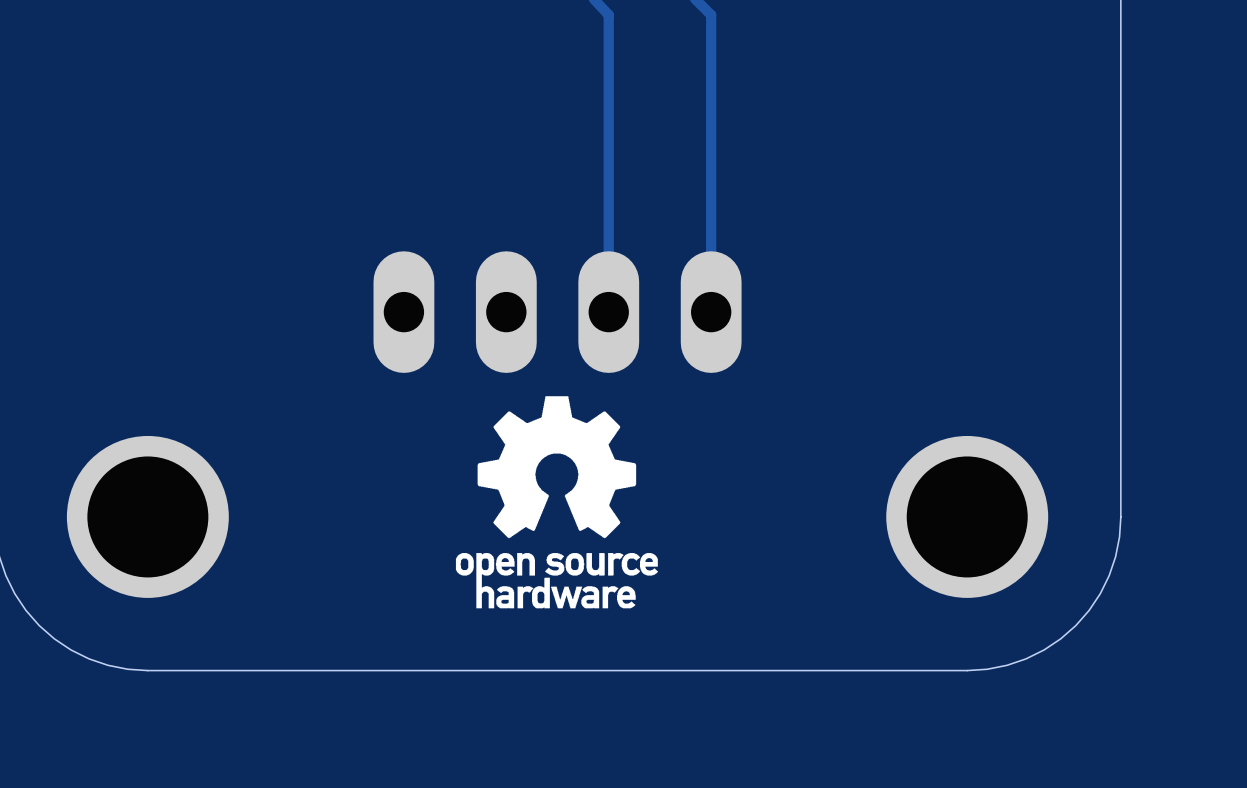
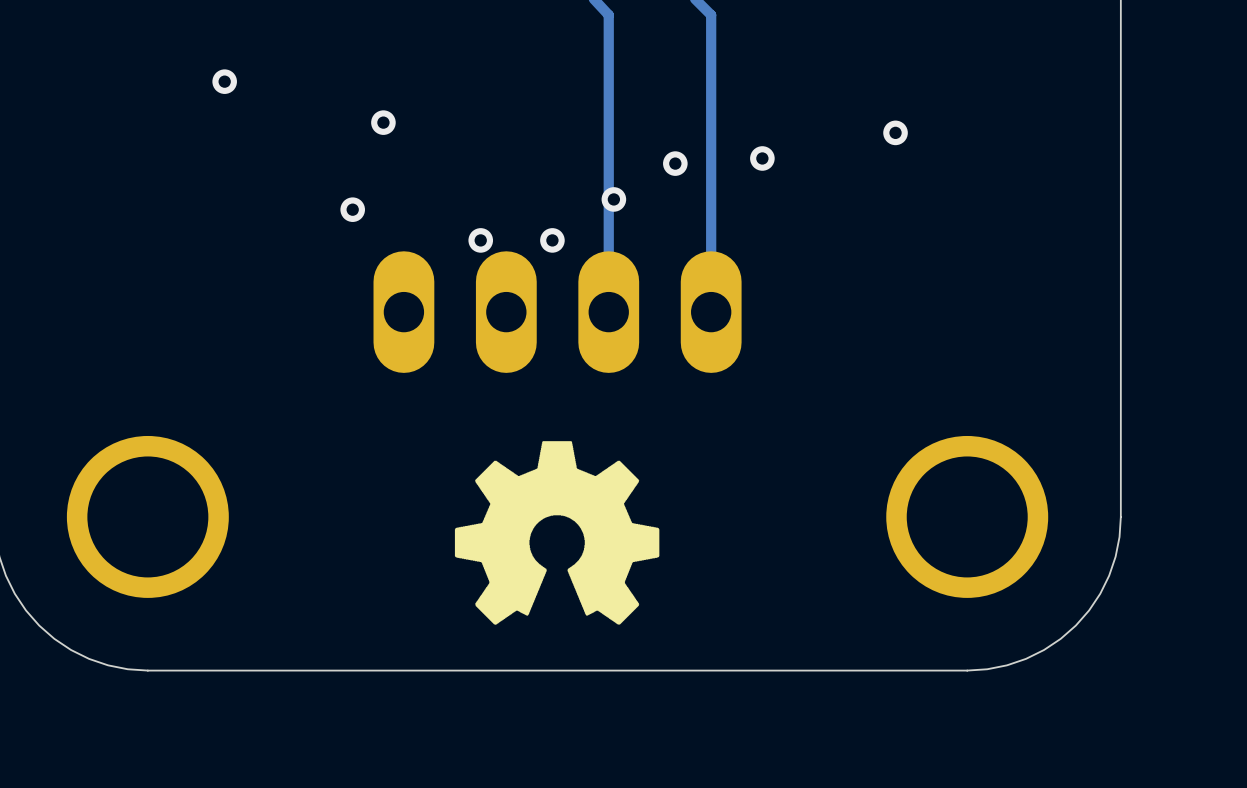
via: none -> (224, 81)
via: none -> (383, 122)
via: none -> (895, 132)
via: none -> (762, 158)
via: none -> (675, 163)
via: none -> (613, 199)
via: none -> (352, 209)
via: none -> (480, 240)
via: none -> (552, 240)
drawing shape: [455, 396, 658, 609] -> [454, 441, 660, 625]

